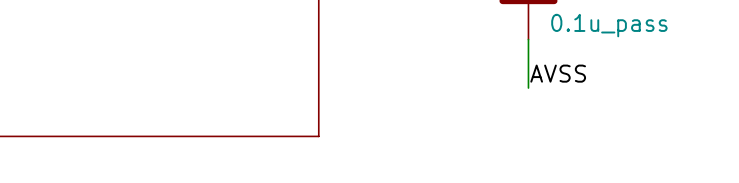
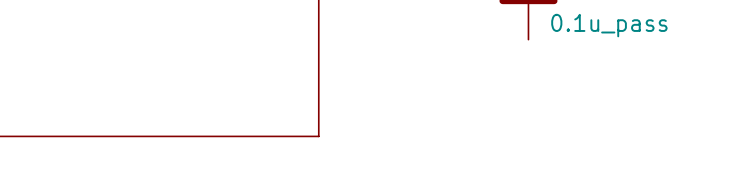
wire: (528, 39) (528, 88) -> none
label: AVSS (558, 73) -> none

